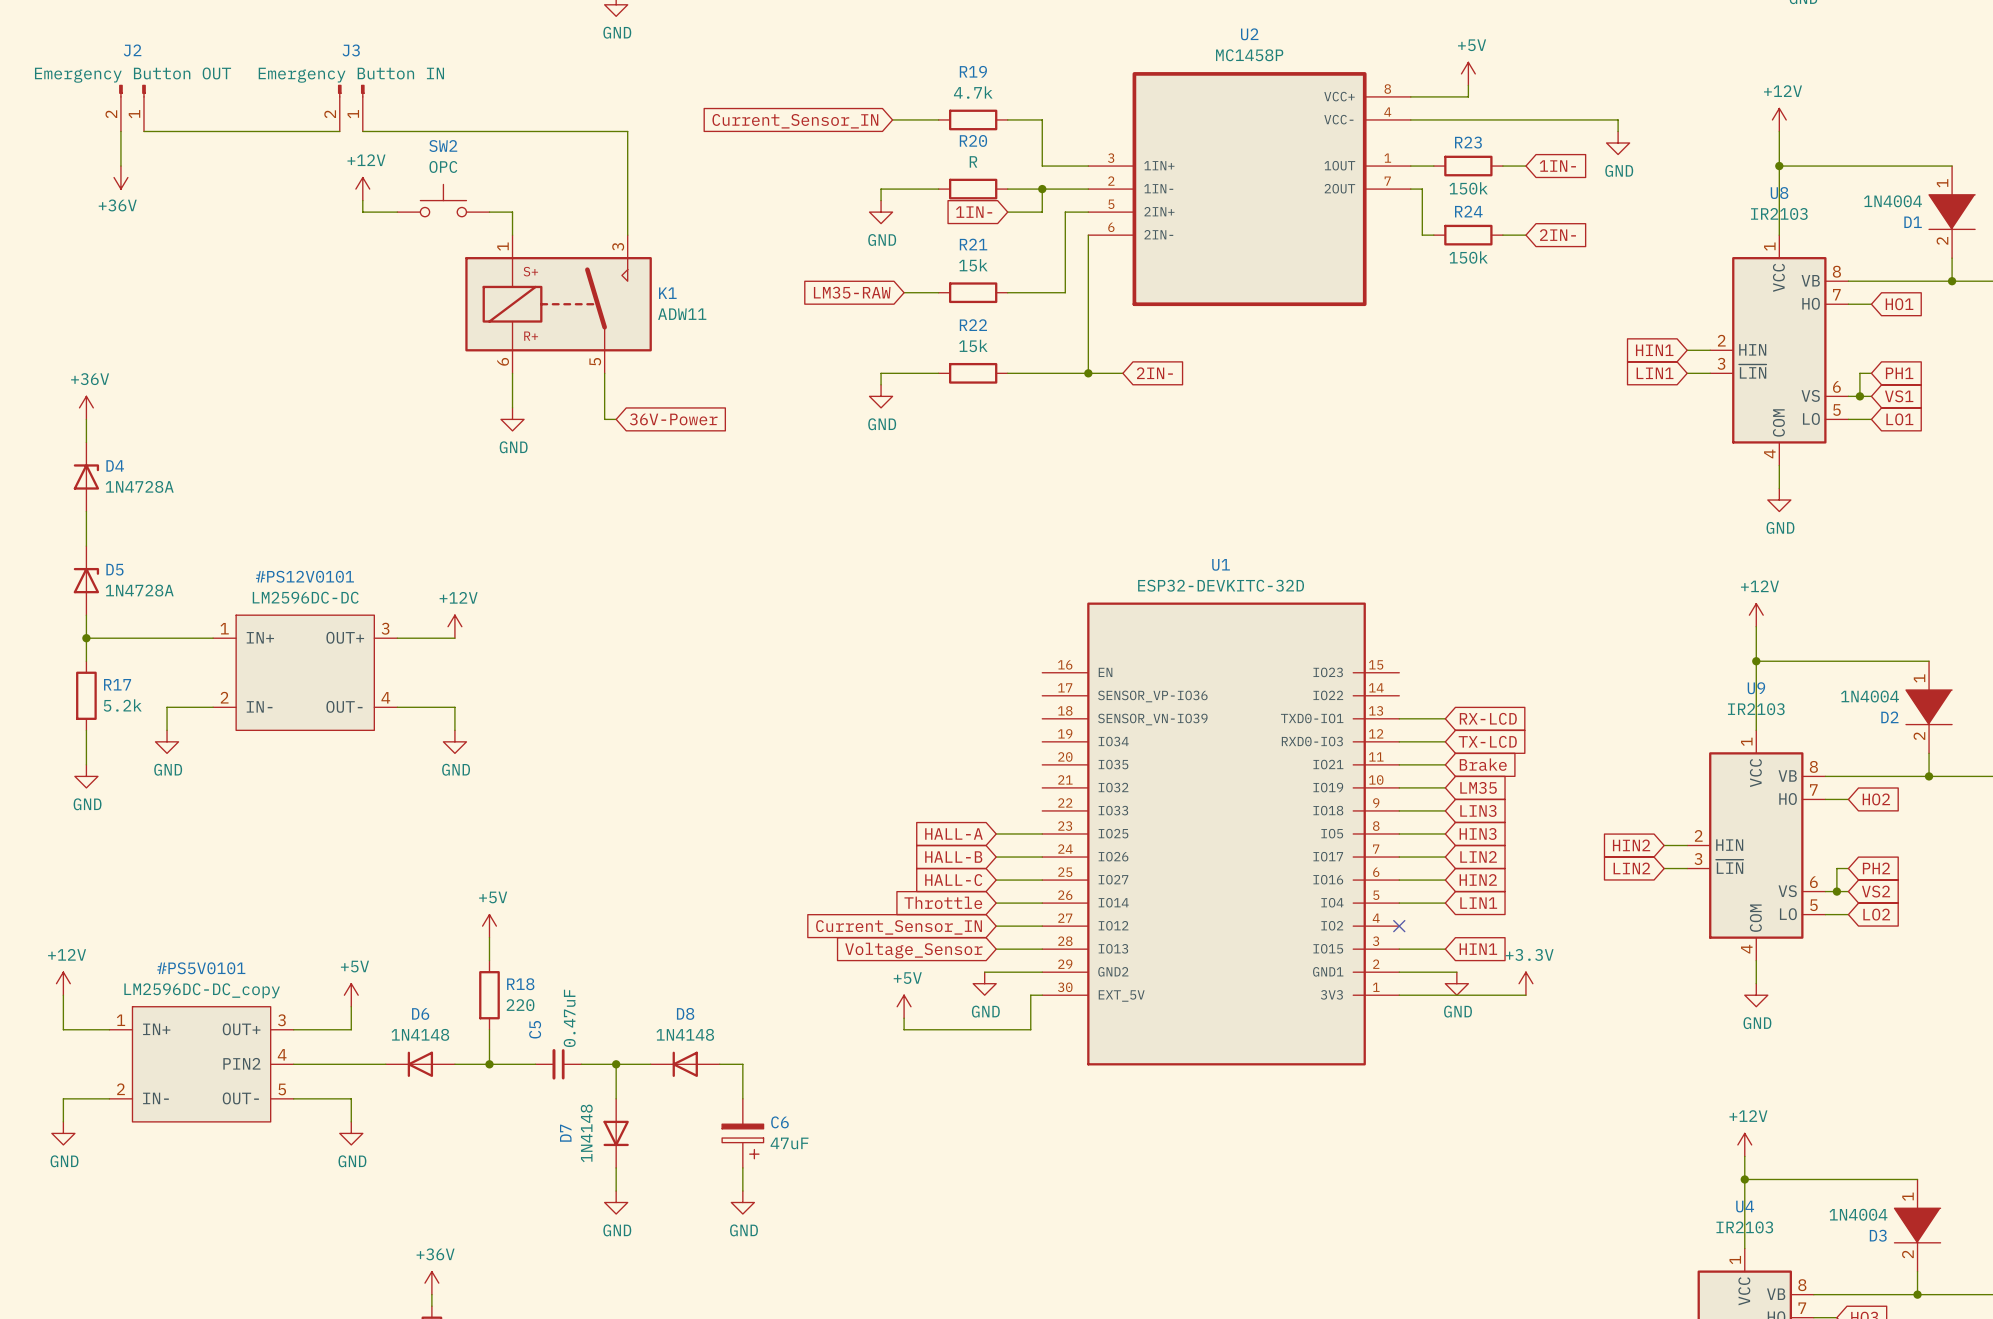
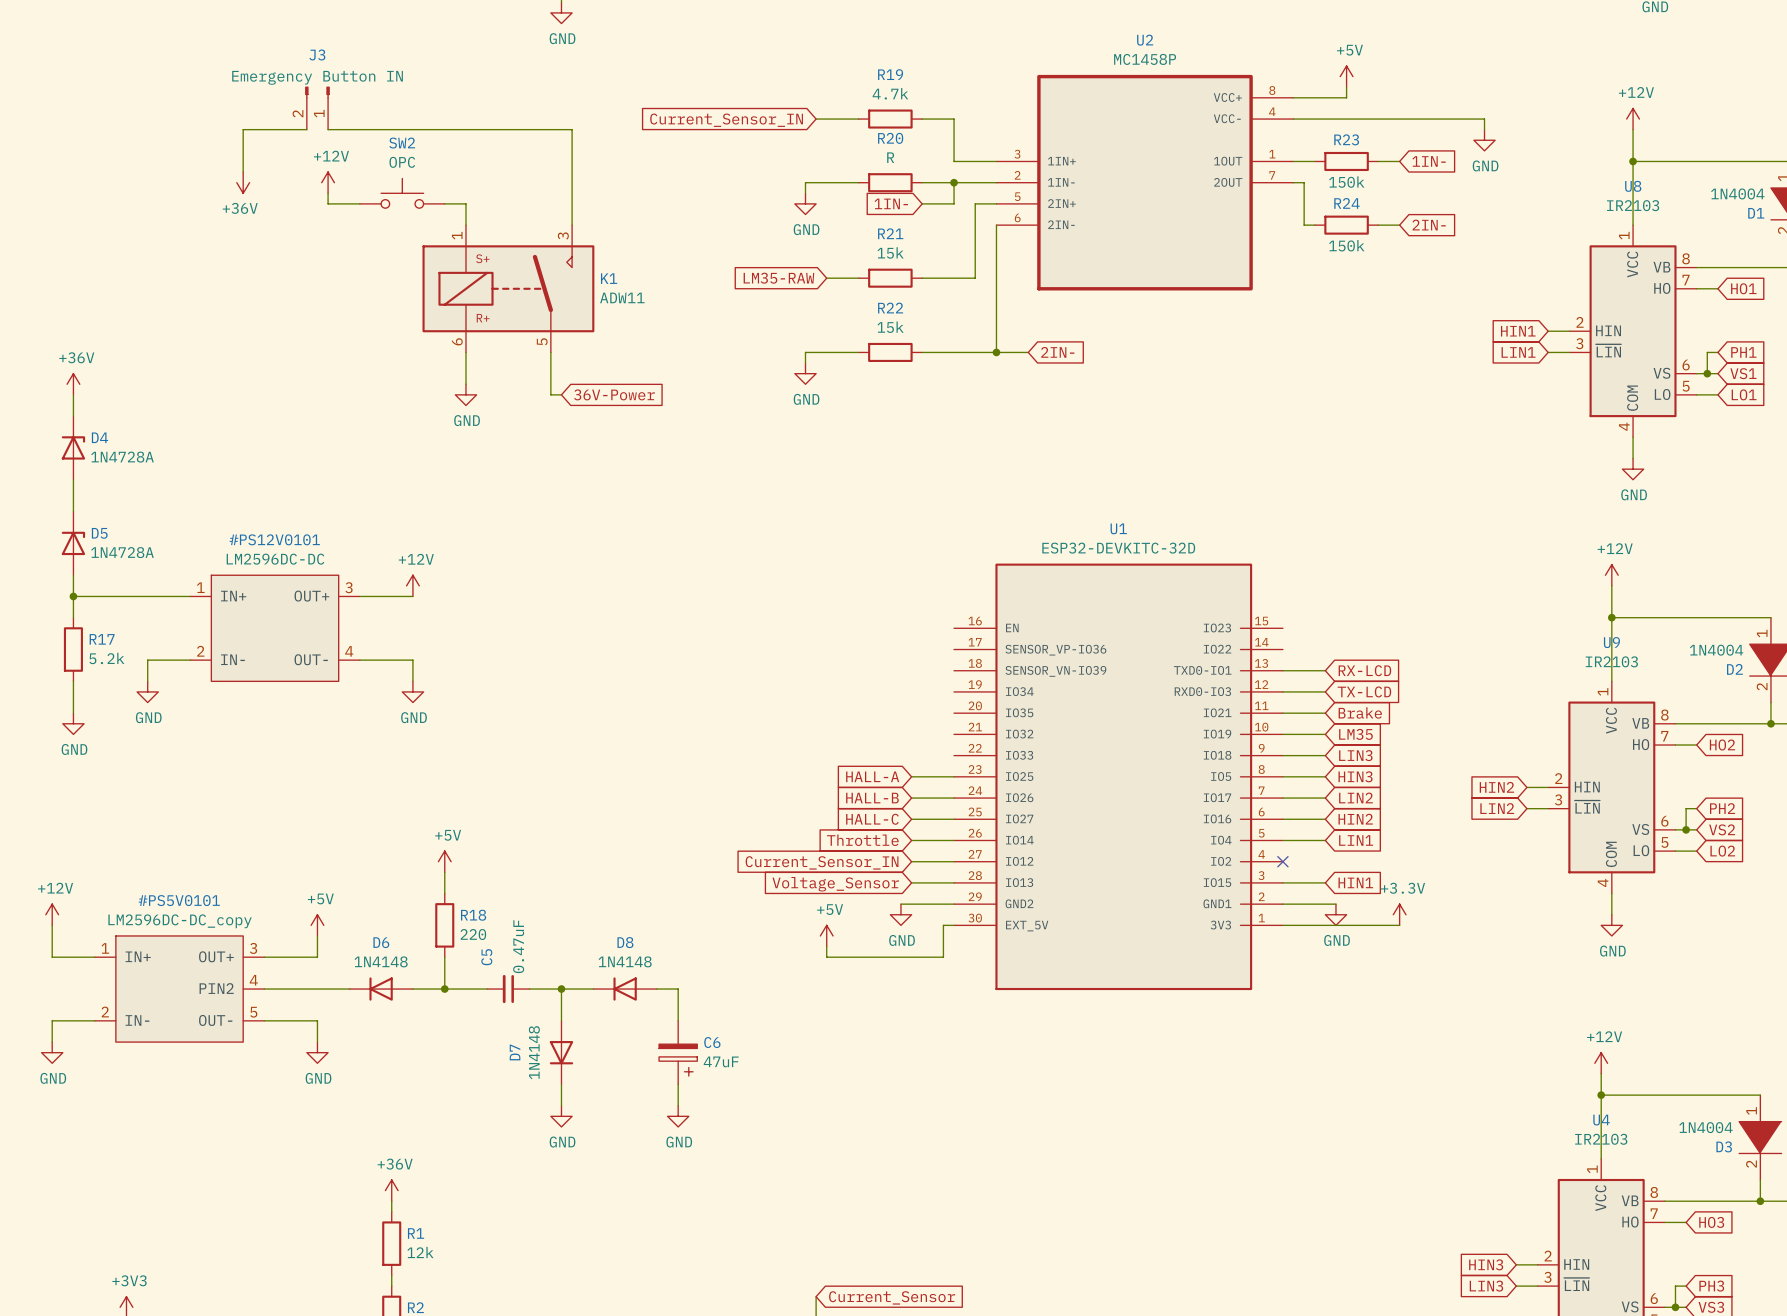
J2: Emergency Button OUT (132, 108) -> none
wire: (120, 131) (120, 166) -> none
wire: (143, 131) (270, 131) -> (243, 172) (243, 129)
power symbol position: +36V (120, 177) -> +36V (243, 182)

